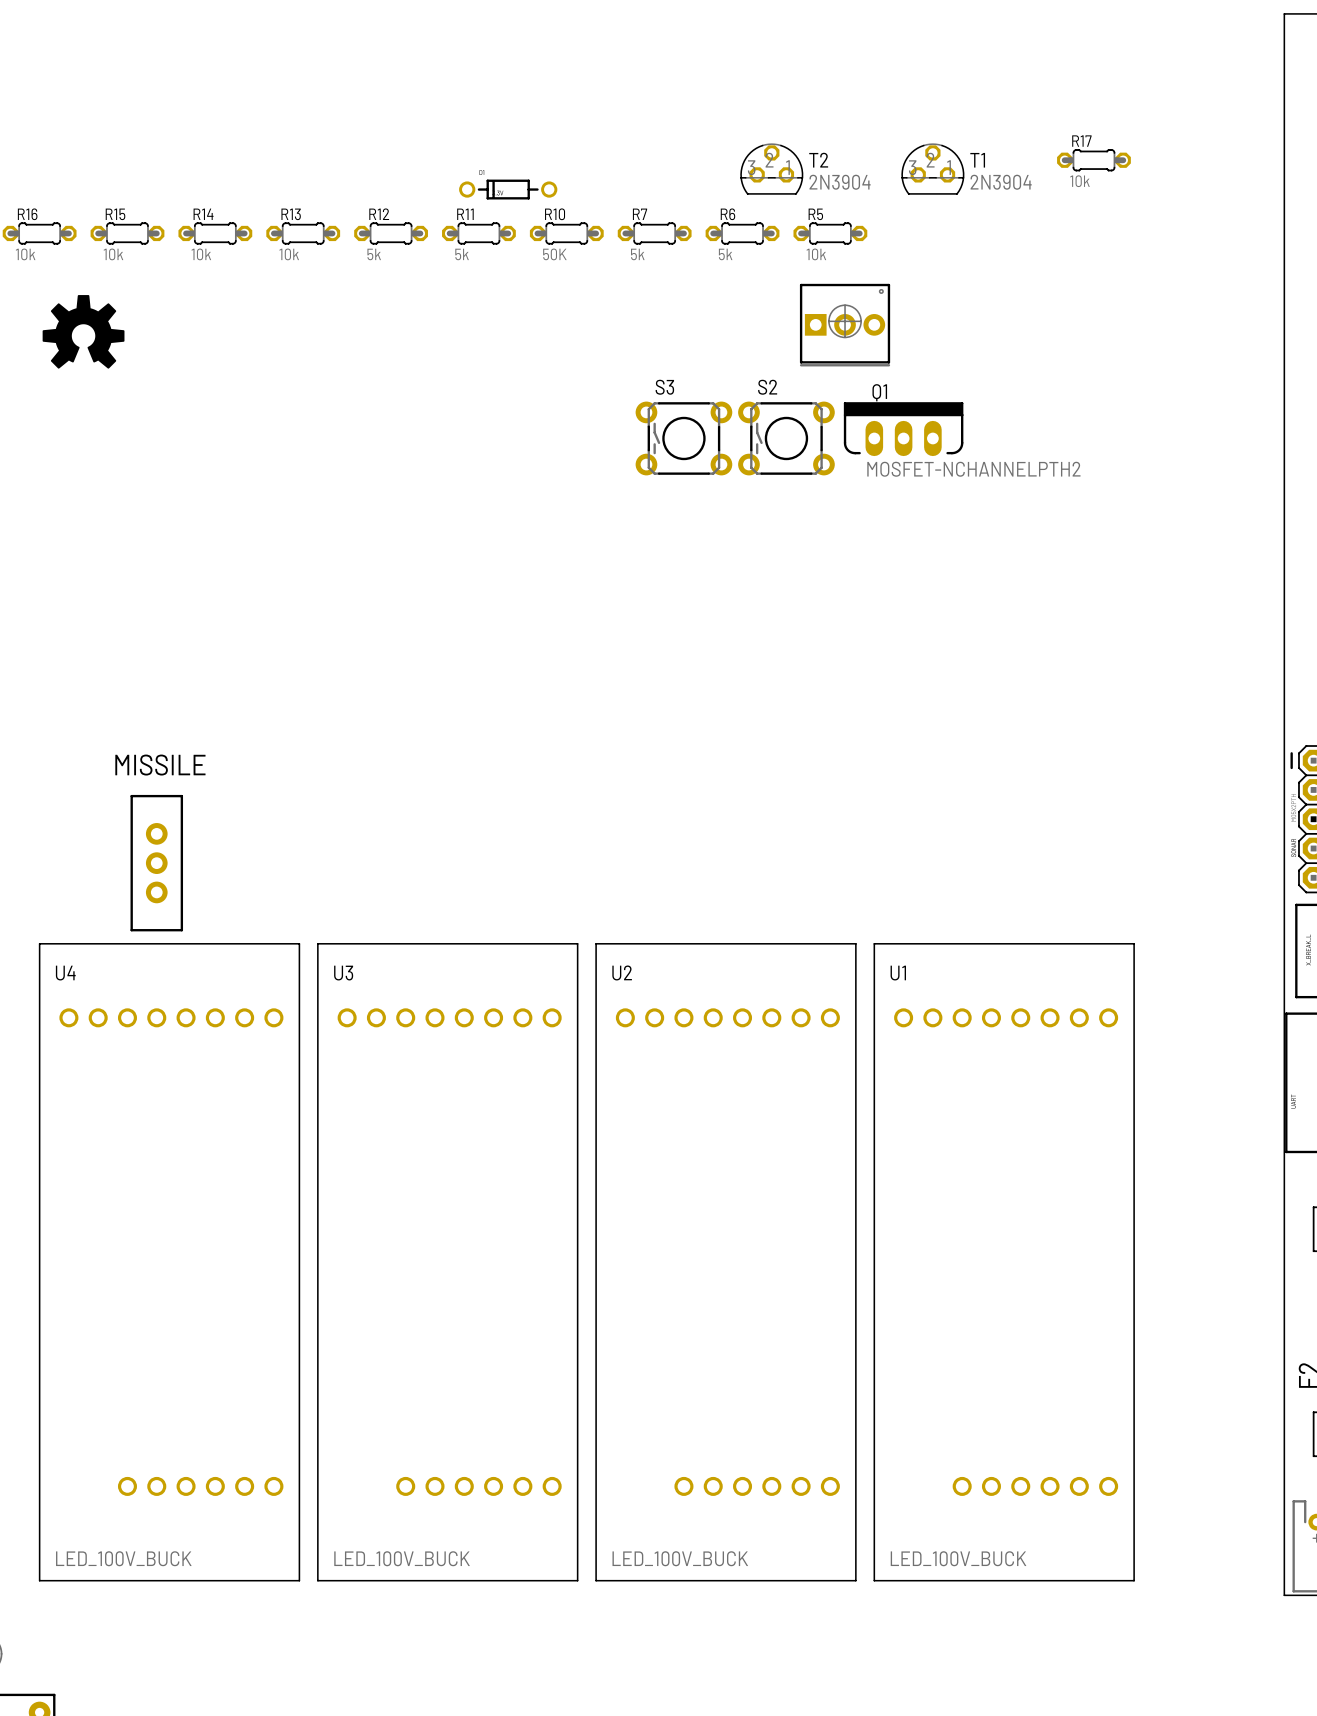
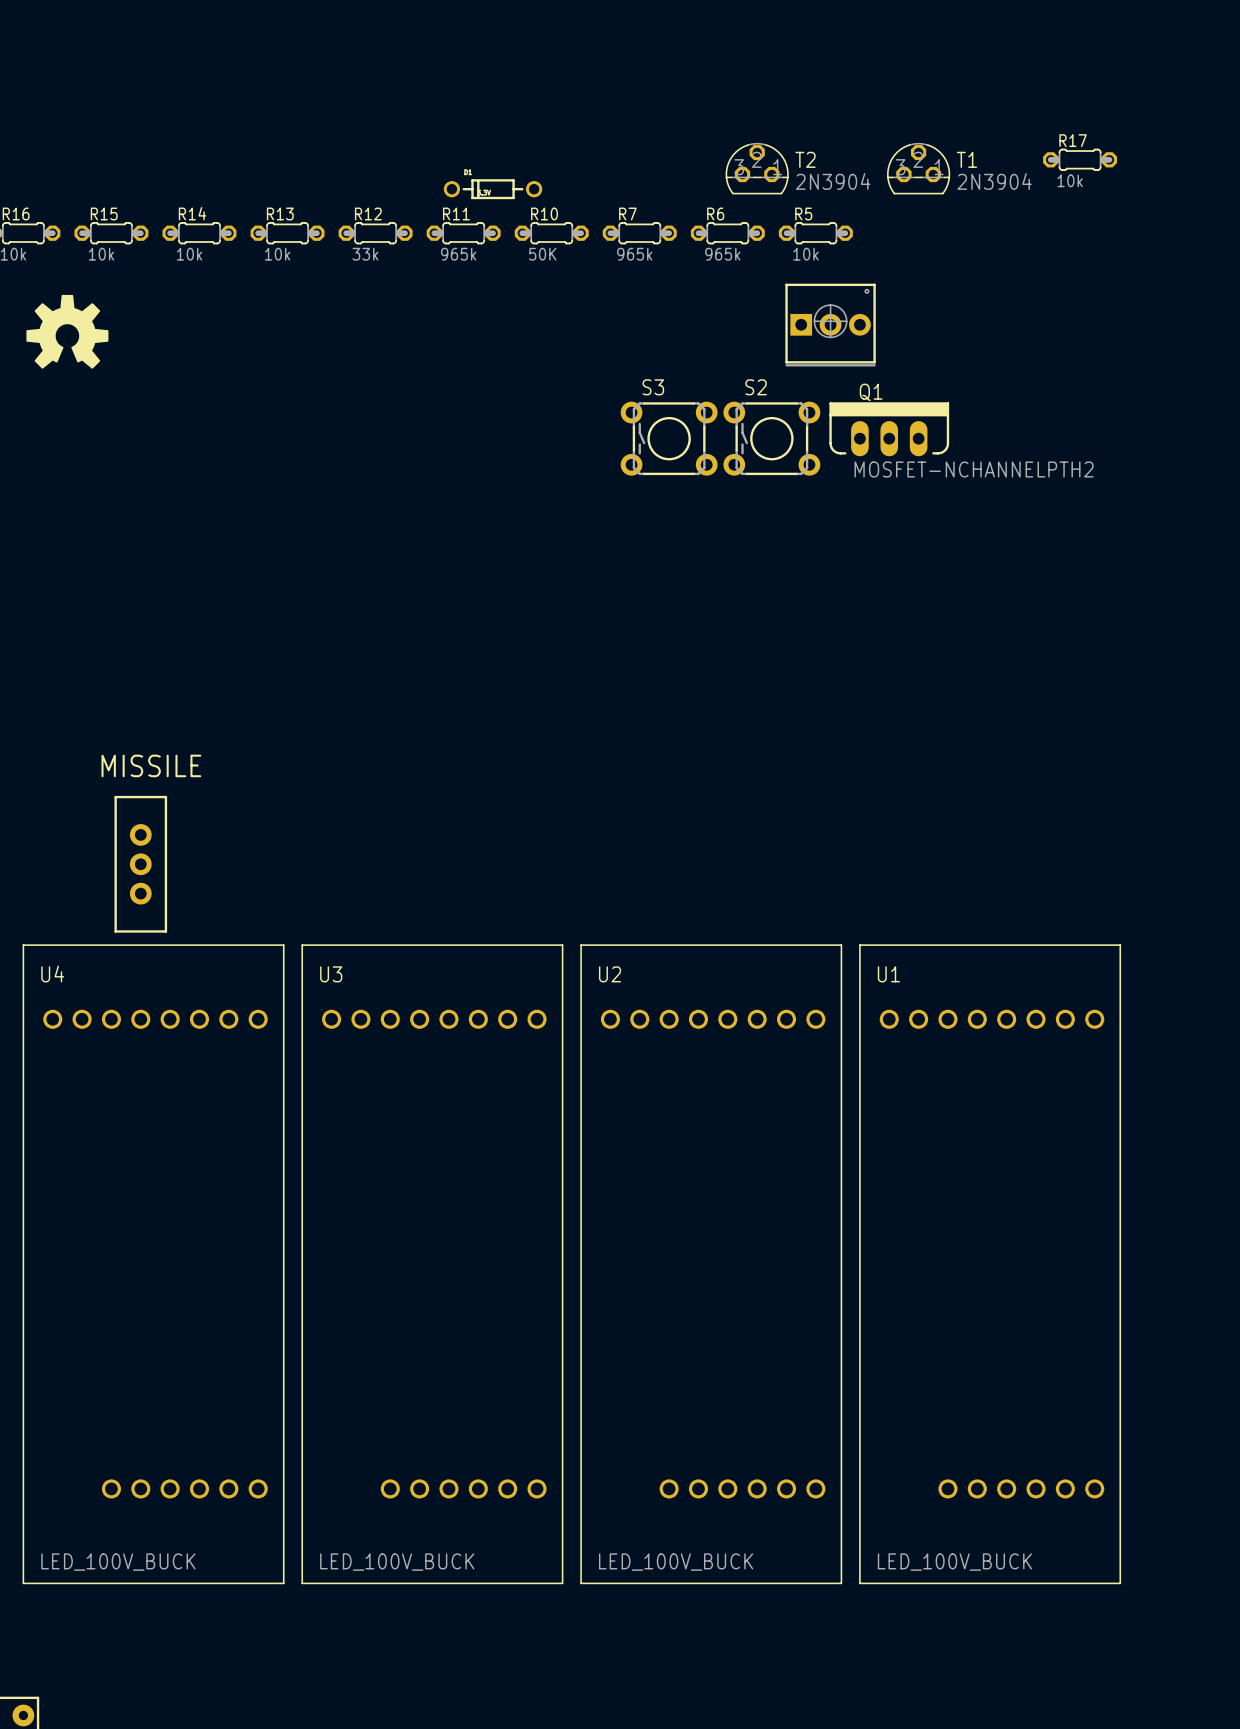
R12 value: 5k (374, 254) -> 33k (365, 254)
R11 value: 5k (462, 254) -> 965k (458, 254)
R7 value: 5k (637, 254) -> 965k (634, 254)
R6 value: 5k (725, 254) -> 965k (722, 254)

